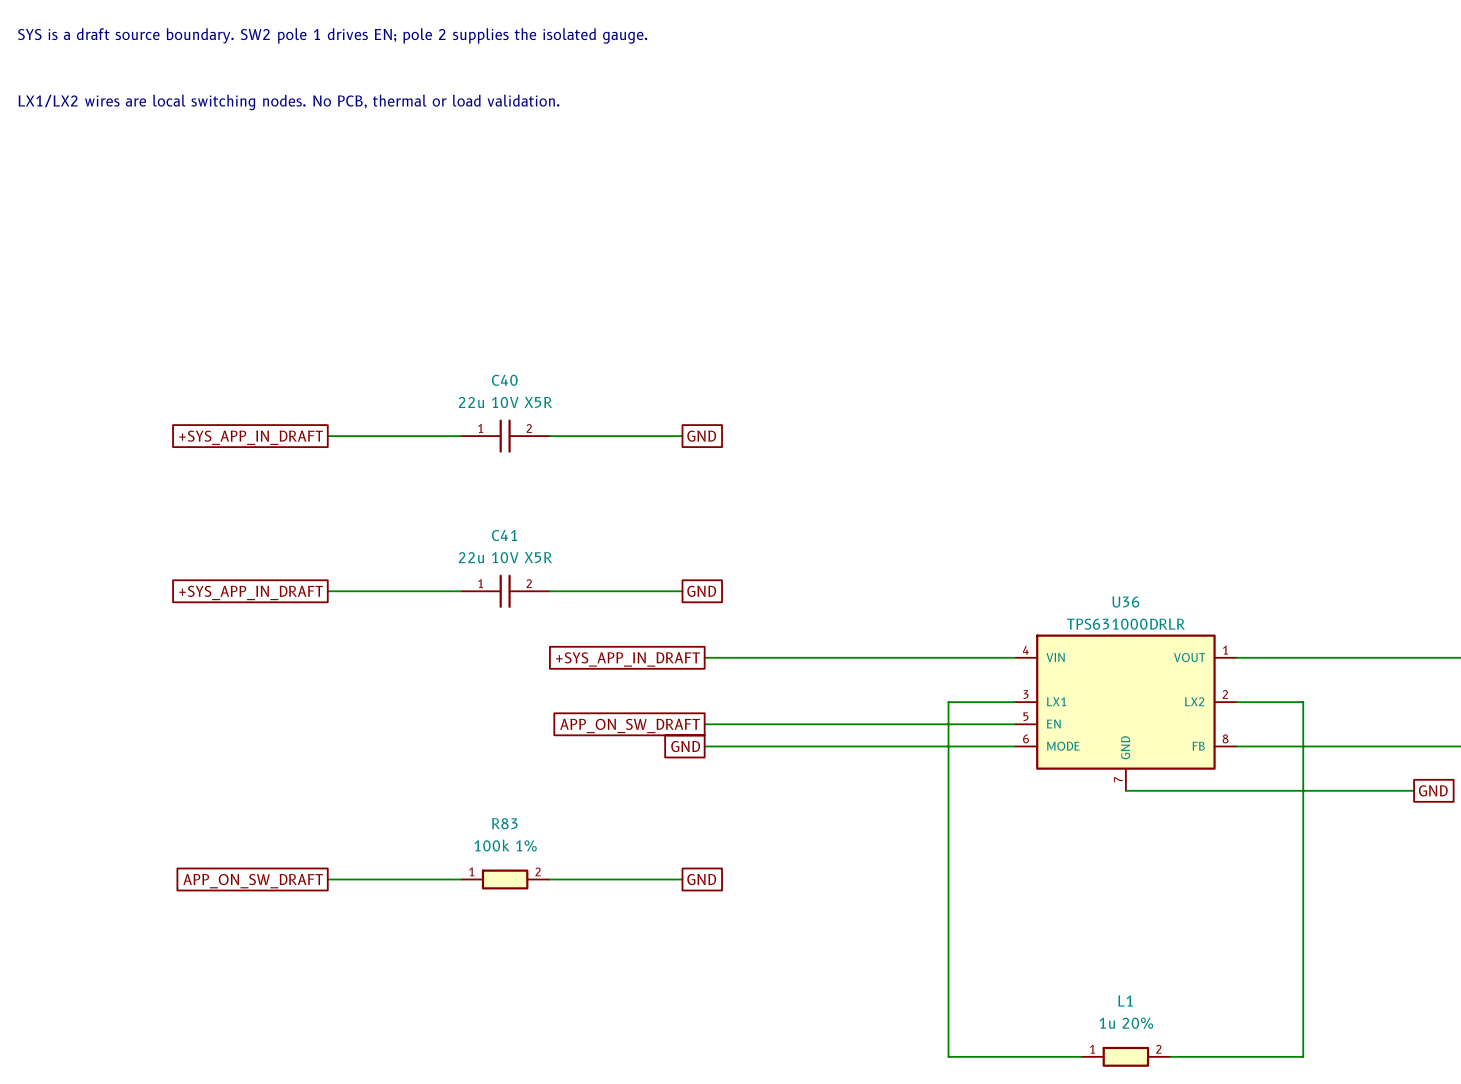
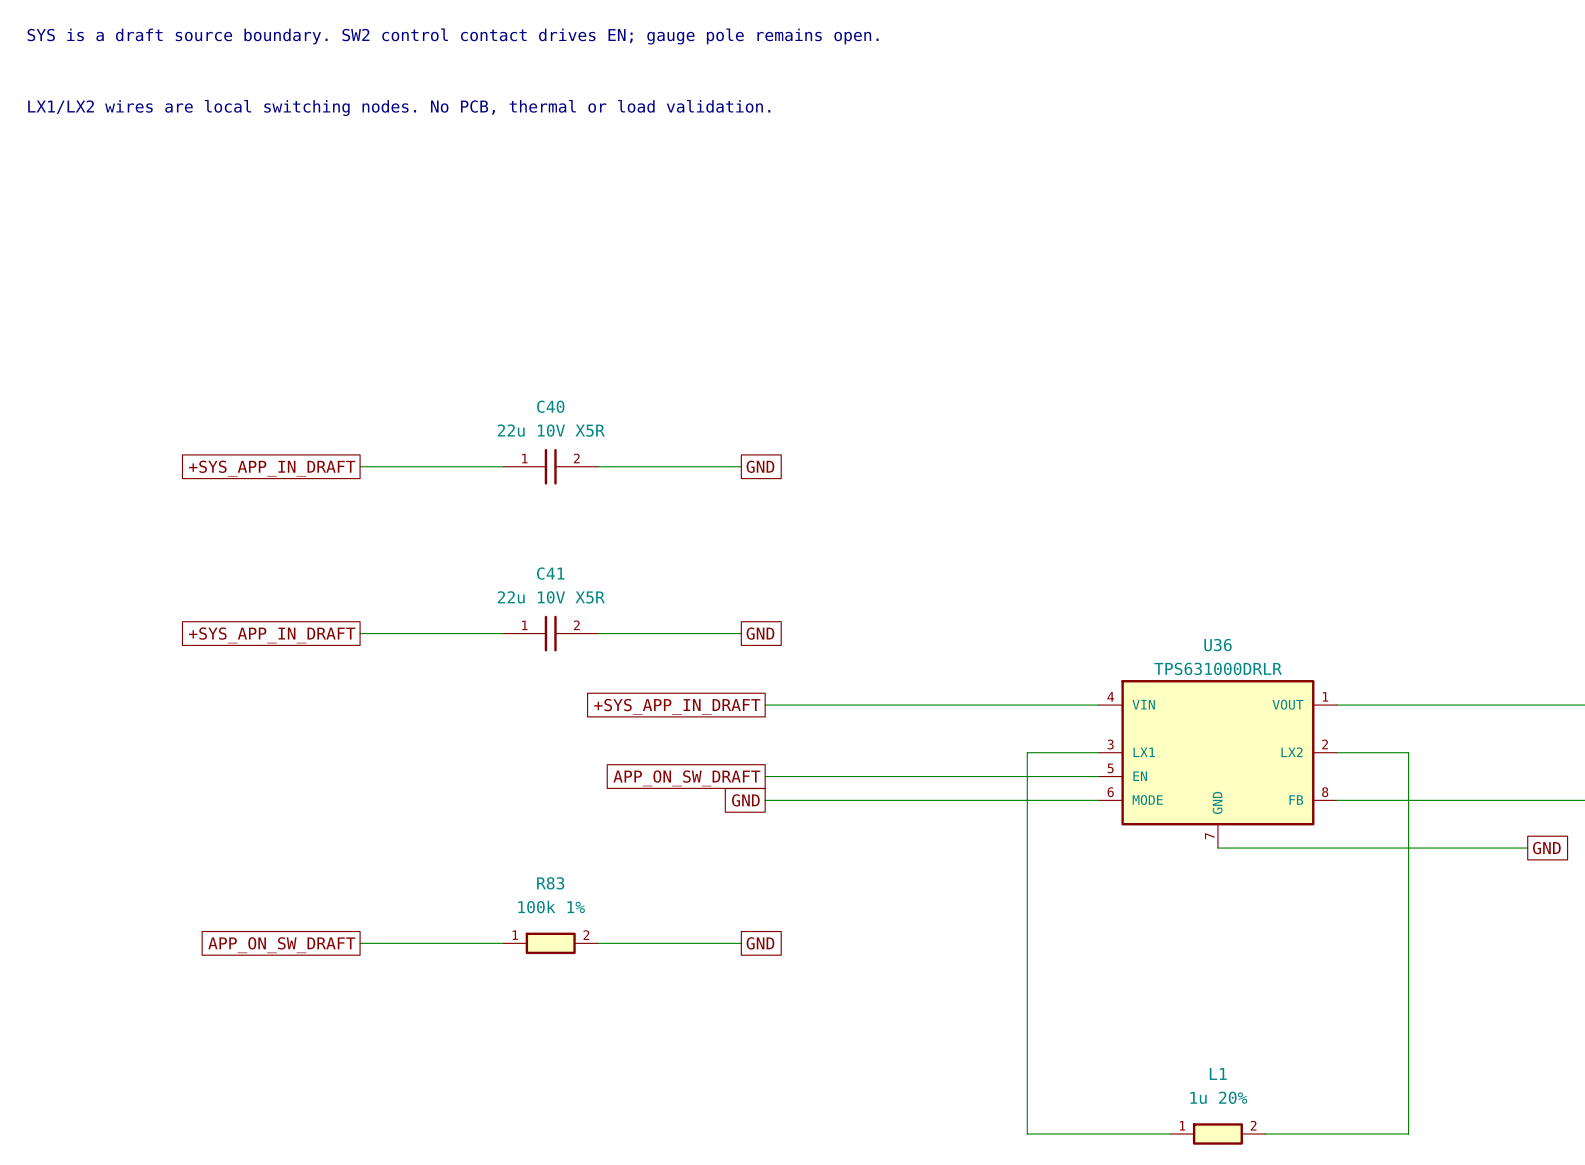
text: SYS is a draft source boundary. SW2 pole 1 drives EN; pole 2 supplies the isolated gauge. (332, 35) -> SYS is a draft source boundary. SW2 control contact drives EN; gauge pole remains open. (453, 36)

